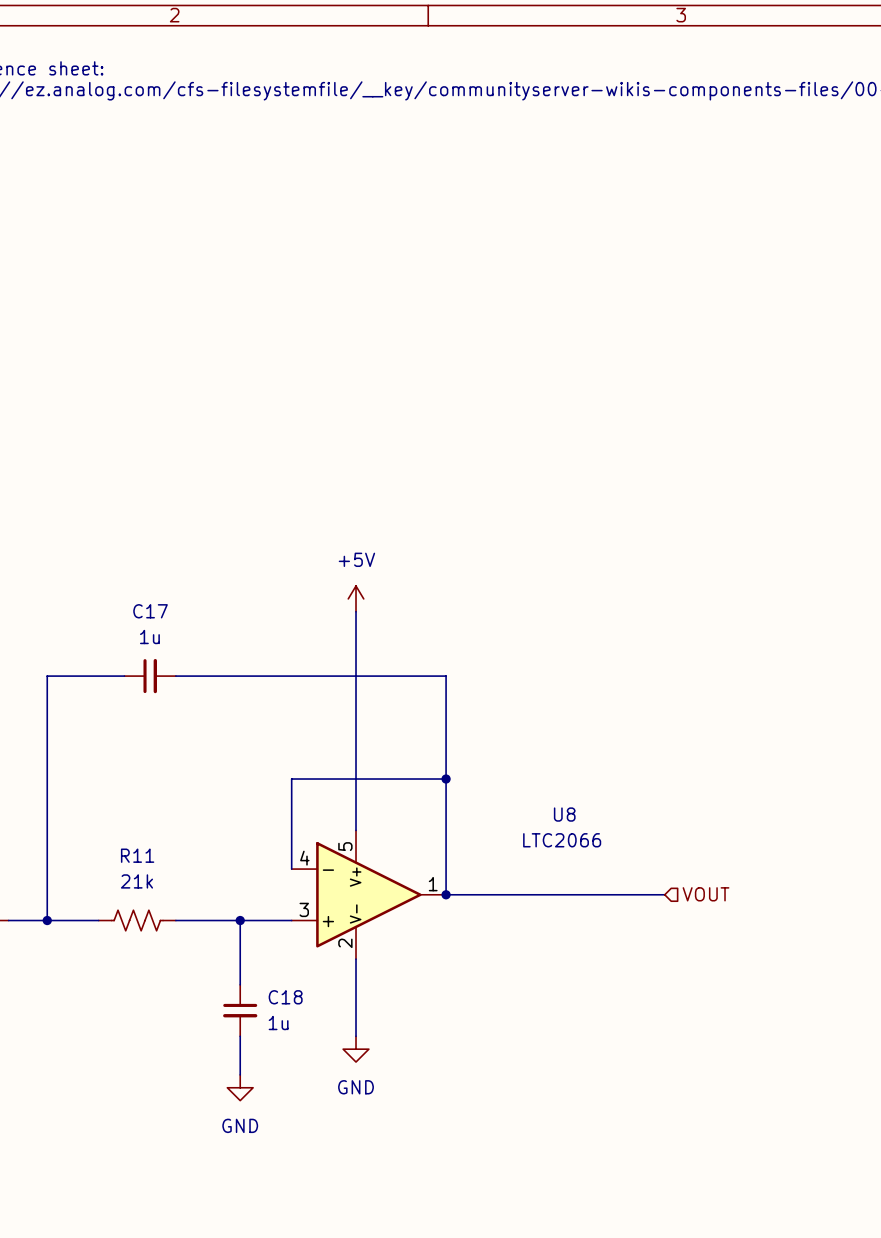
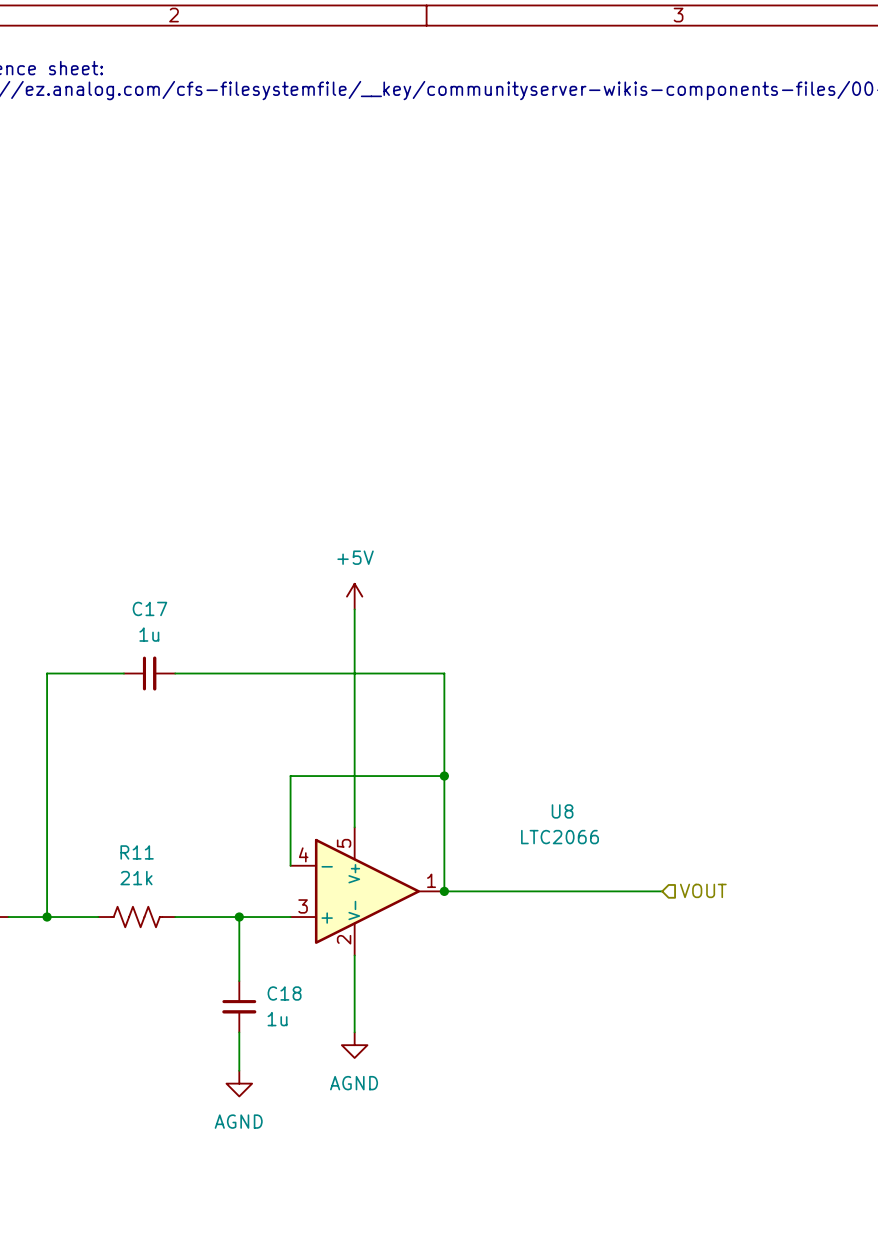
power symbol: GND (356, 1049) -> AGND (354, 1045)
power symbol: GND (240, 1087) -> AGND (239, 1083)

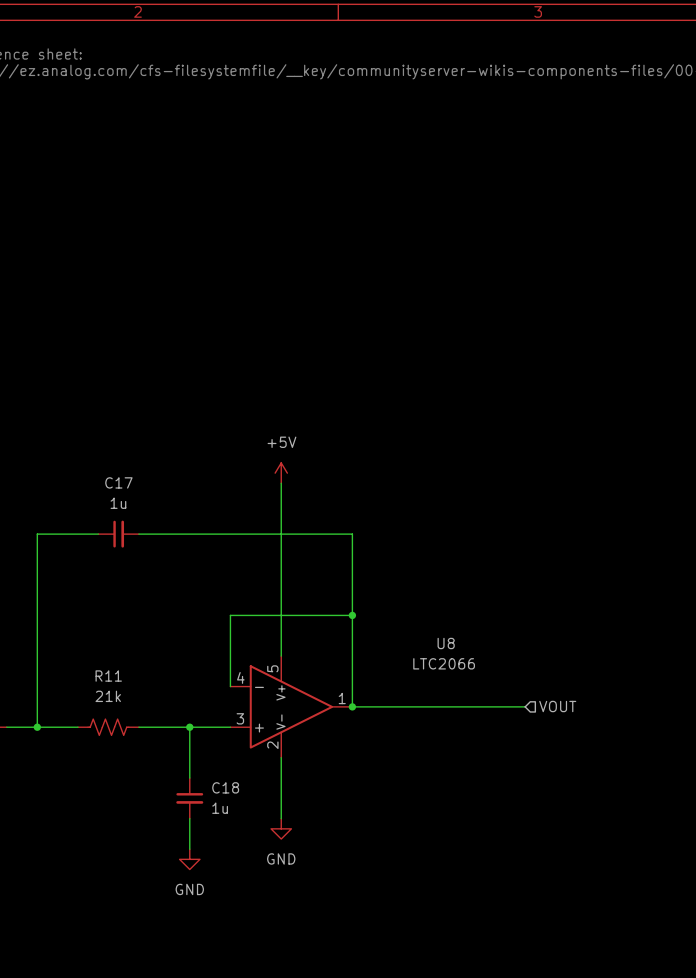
power symbol: AGND (354, 1045) -> GND (281, 828)
power symbol: AGND (239, 1083) -> GND (189, 859)

